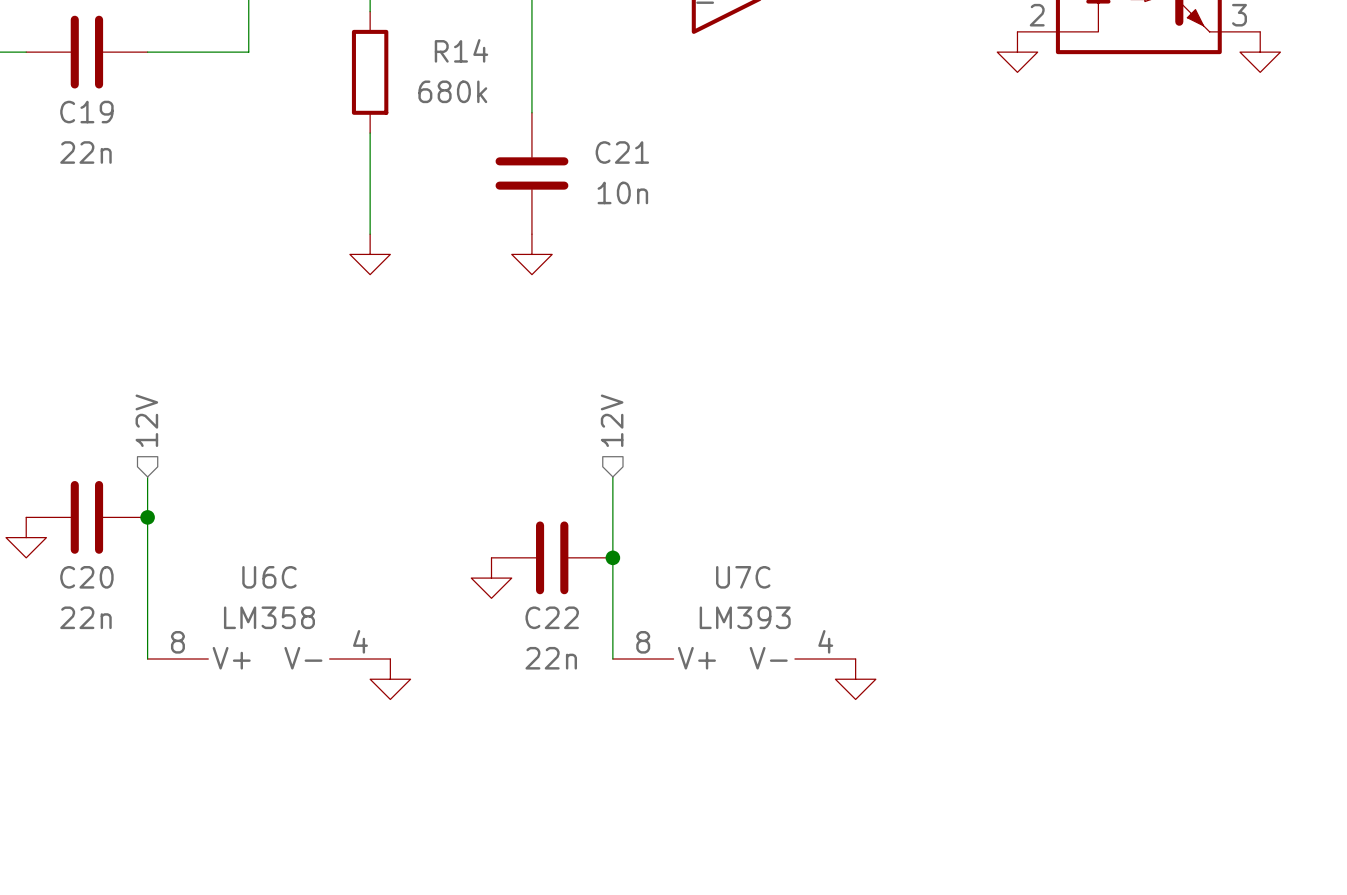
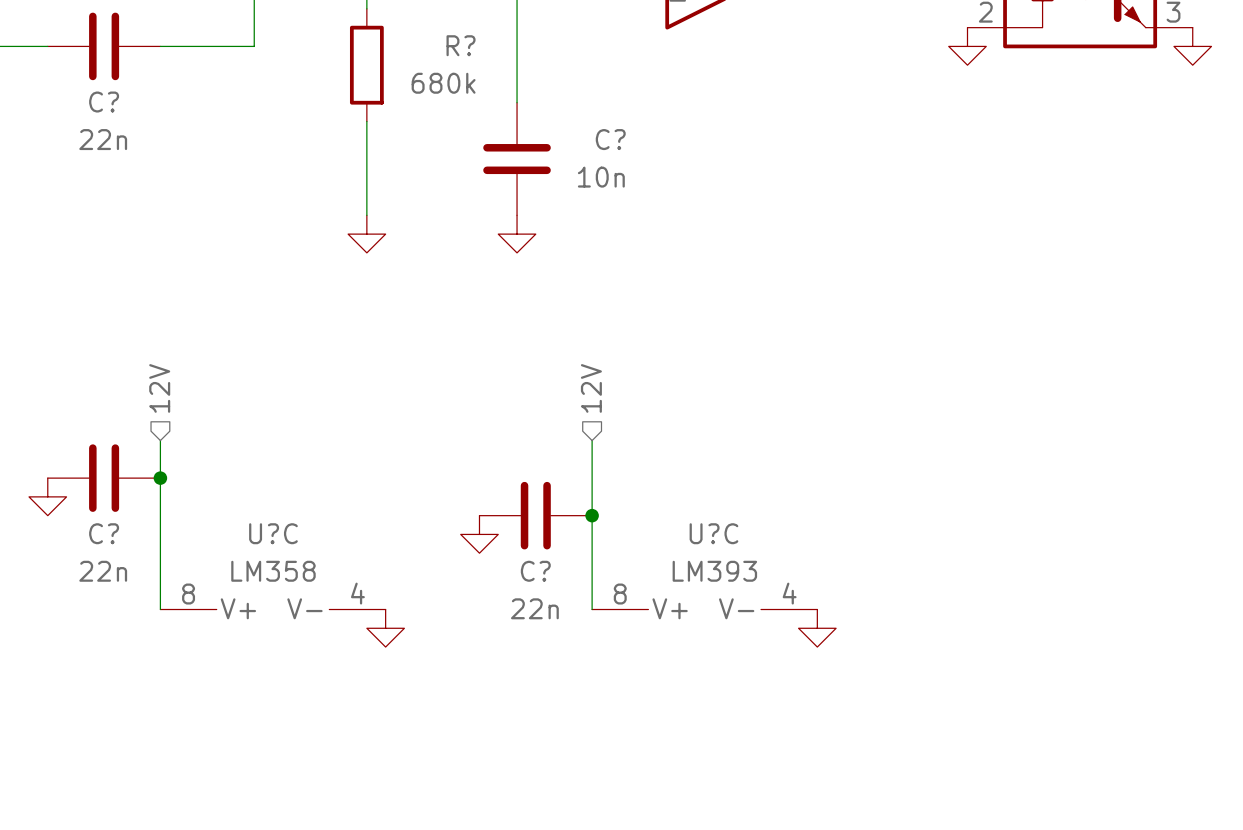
R14 name: R14 (461, 50) -> R? (461, 45)
C19 name: C19 (86, 112) -> C? (104, 102)
C21 name: C21 (622, 152) -> C? (610, 139)
C20 name: C20 (86, 577) -> C? (104, 533)
U6C name: U6C (269, 577) -> U?C (273, 533)
U7C name: U7C (743, 577) -> U?C (713, 533)
C22 name: C22 (552, 617) -> C? (535, 571)

